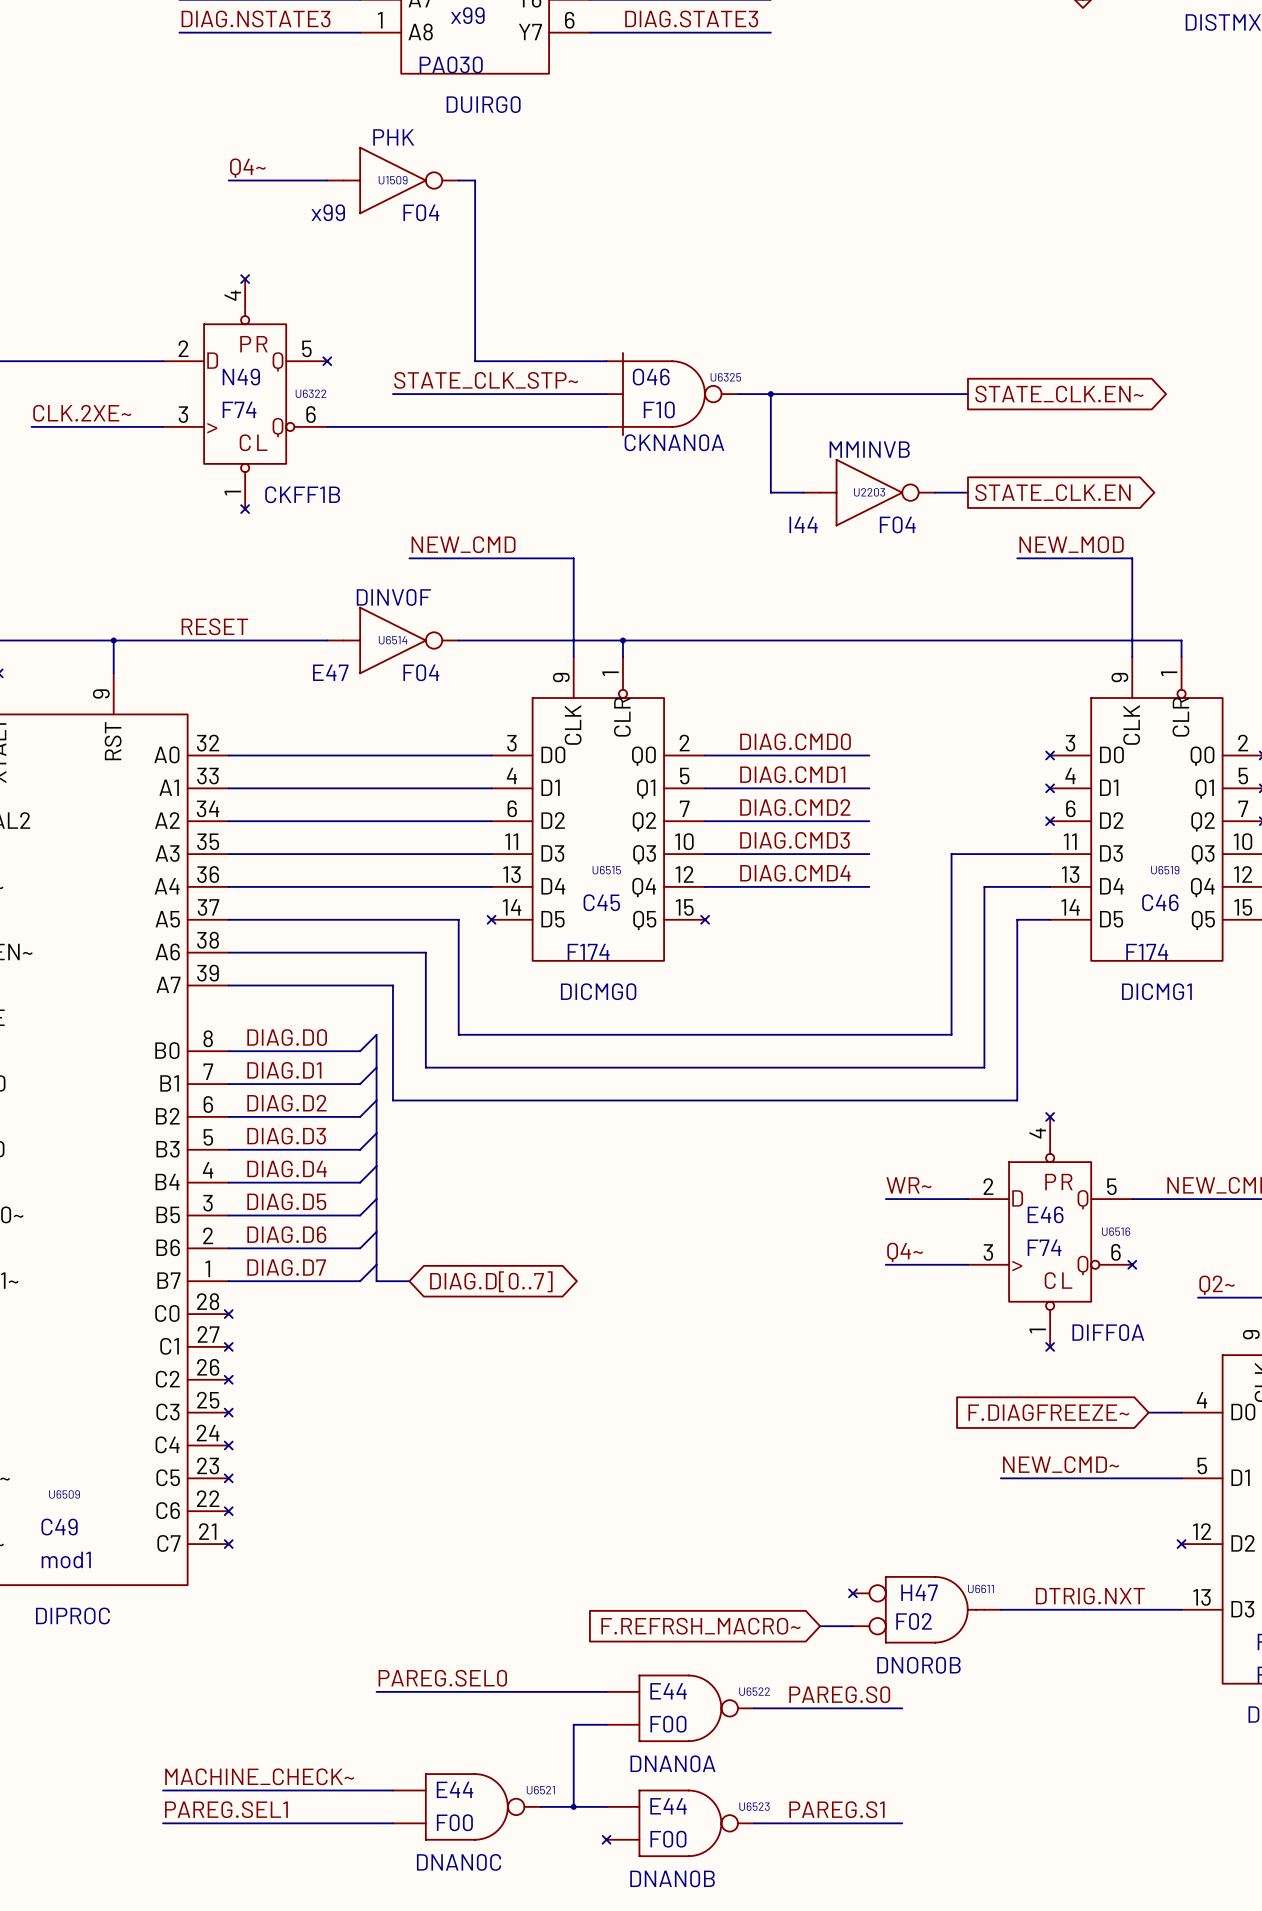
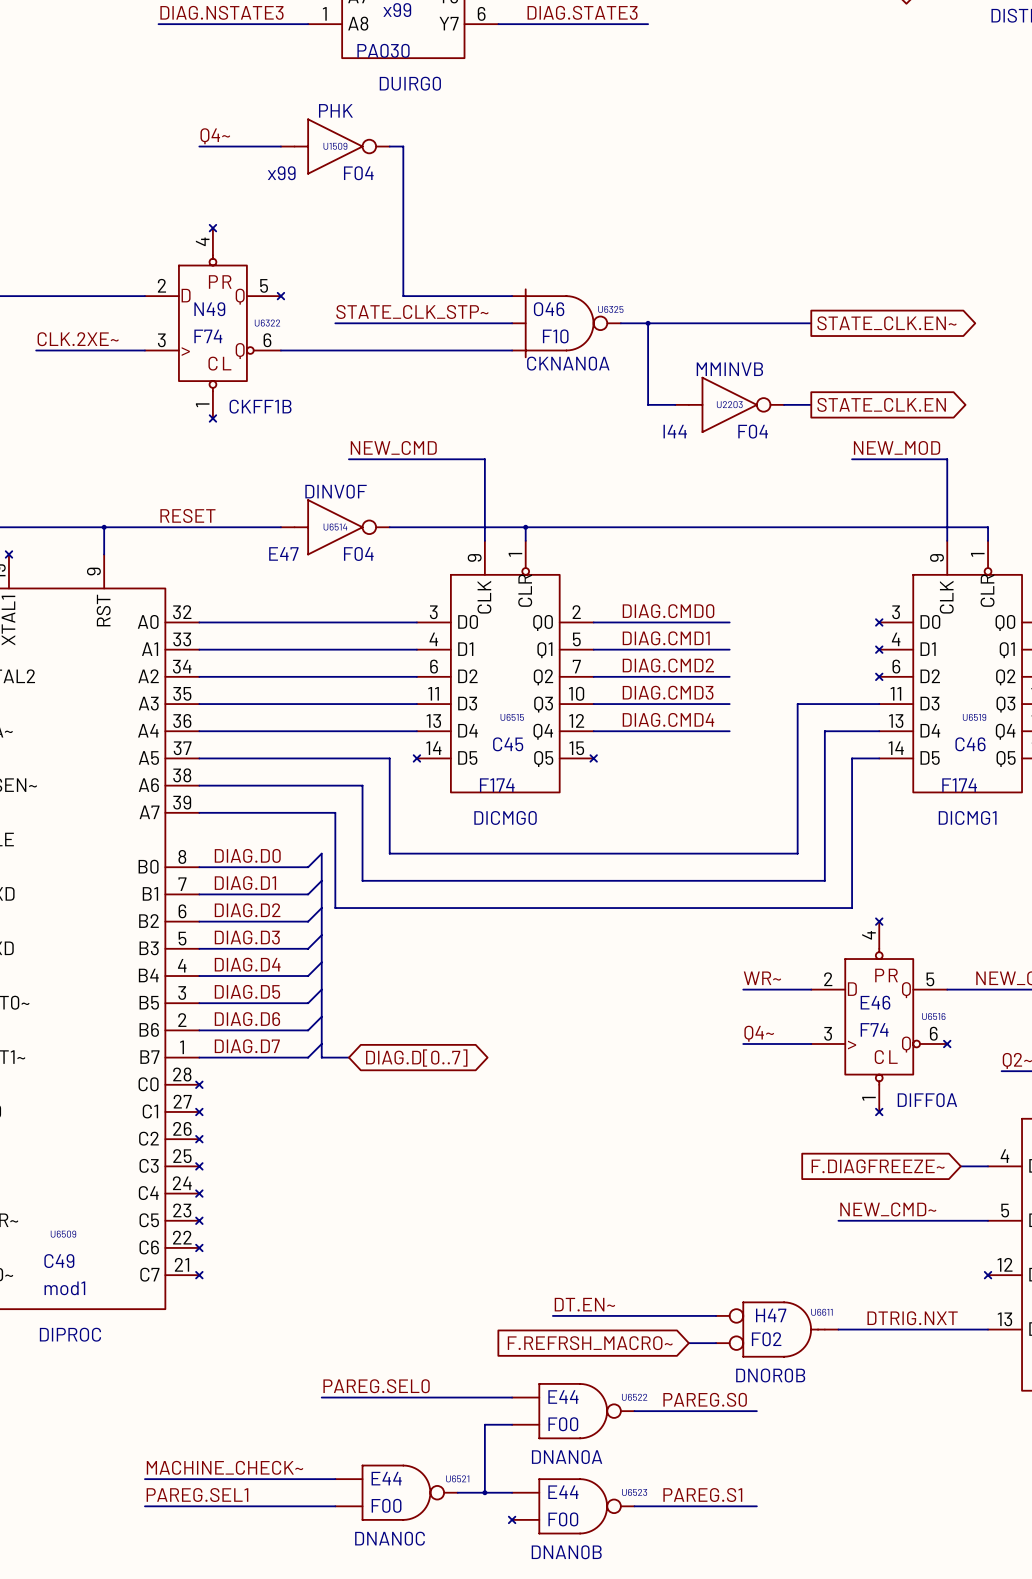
label: none -> DT.EN~ (584, 1304)
wire: none -> (552, 1315) (716, 1315)
no-connect mark: (852, 1593) -> none

